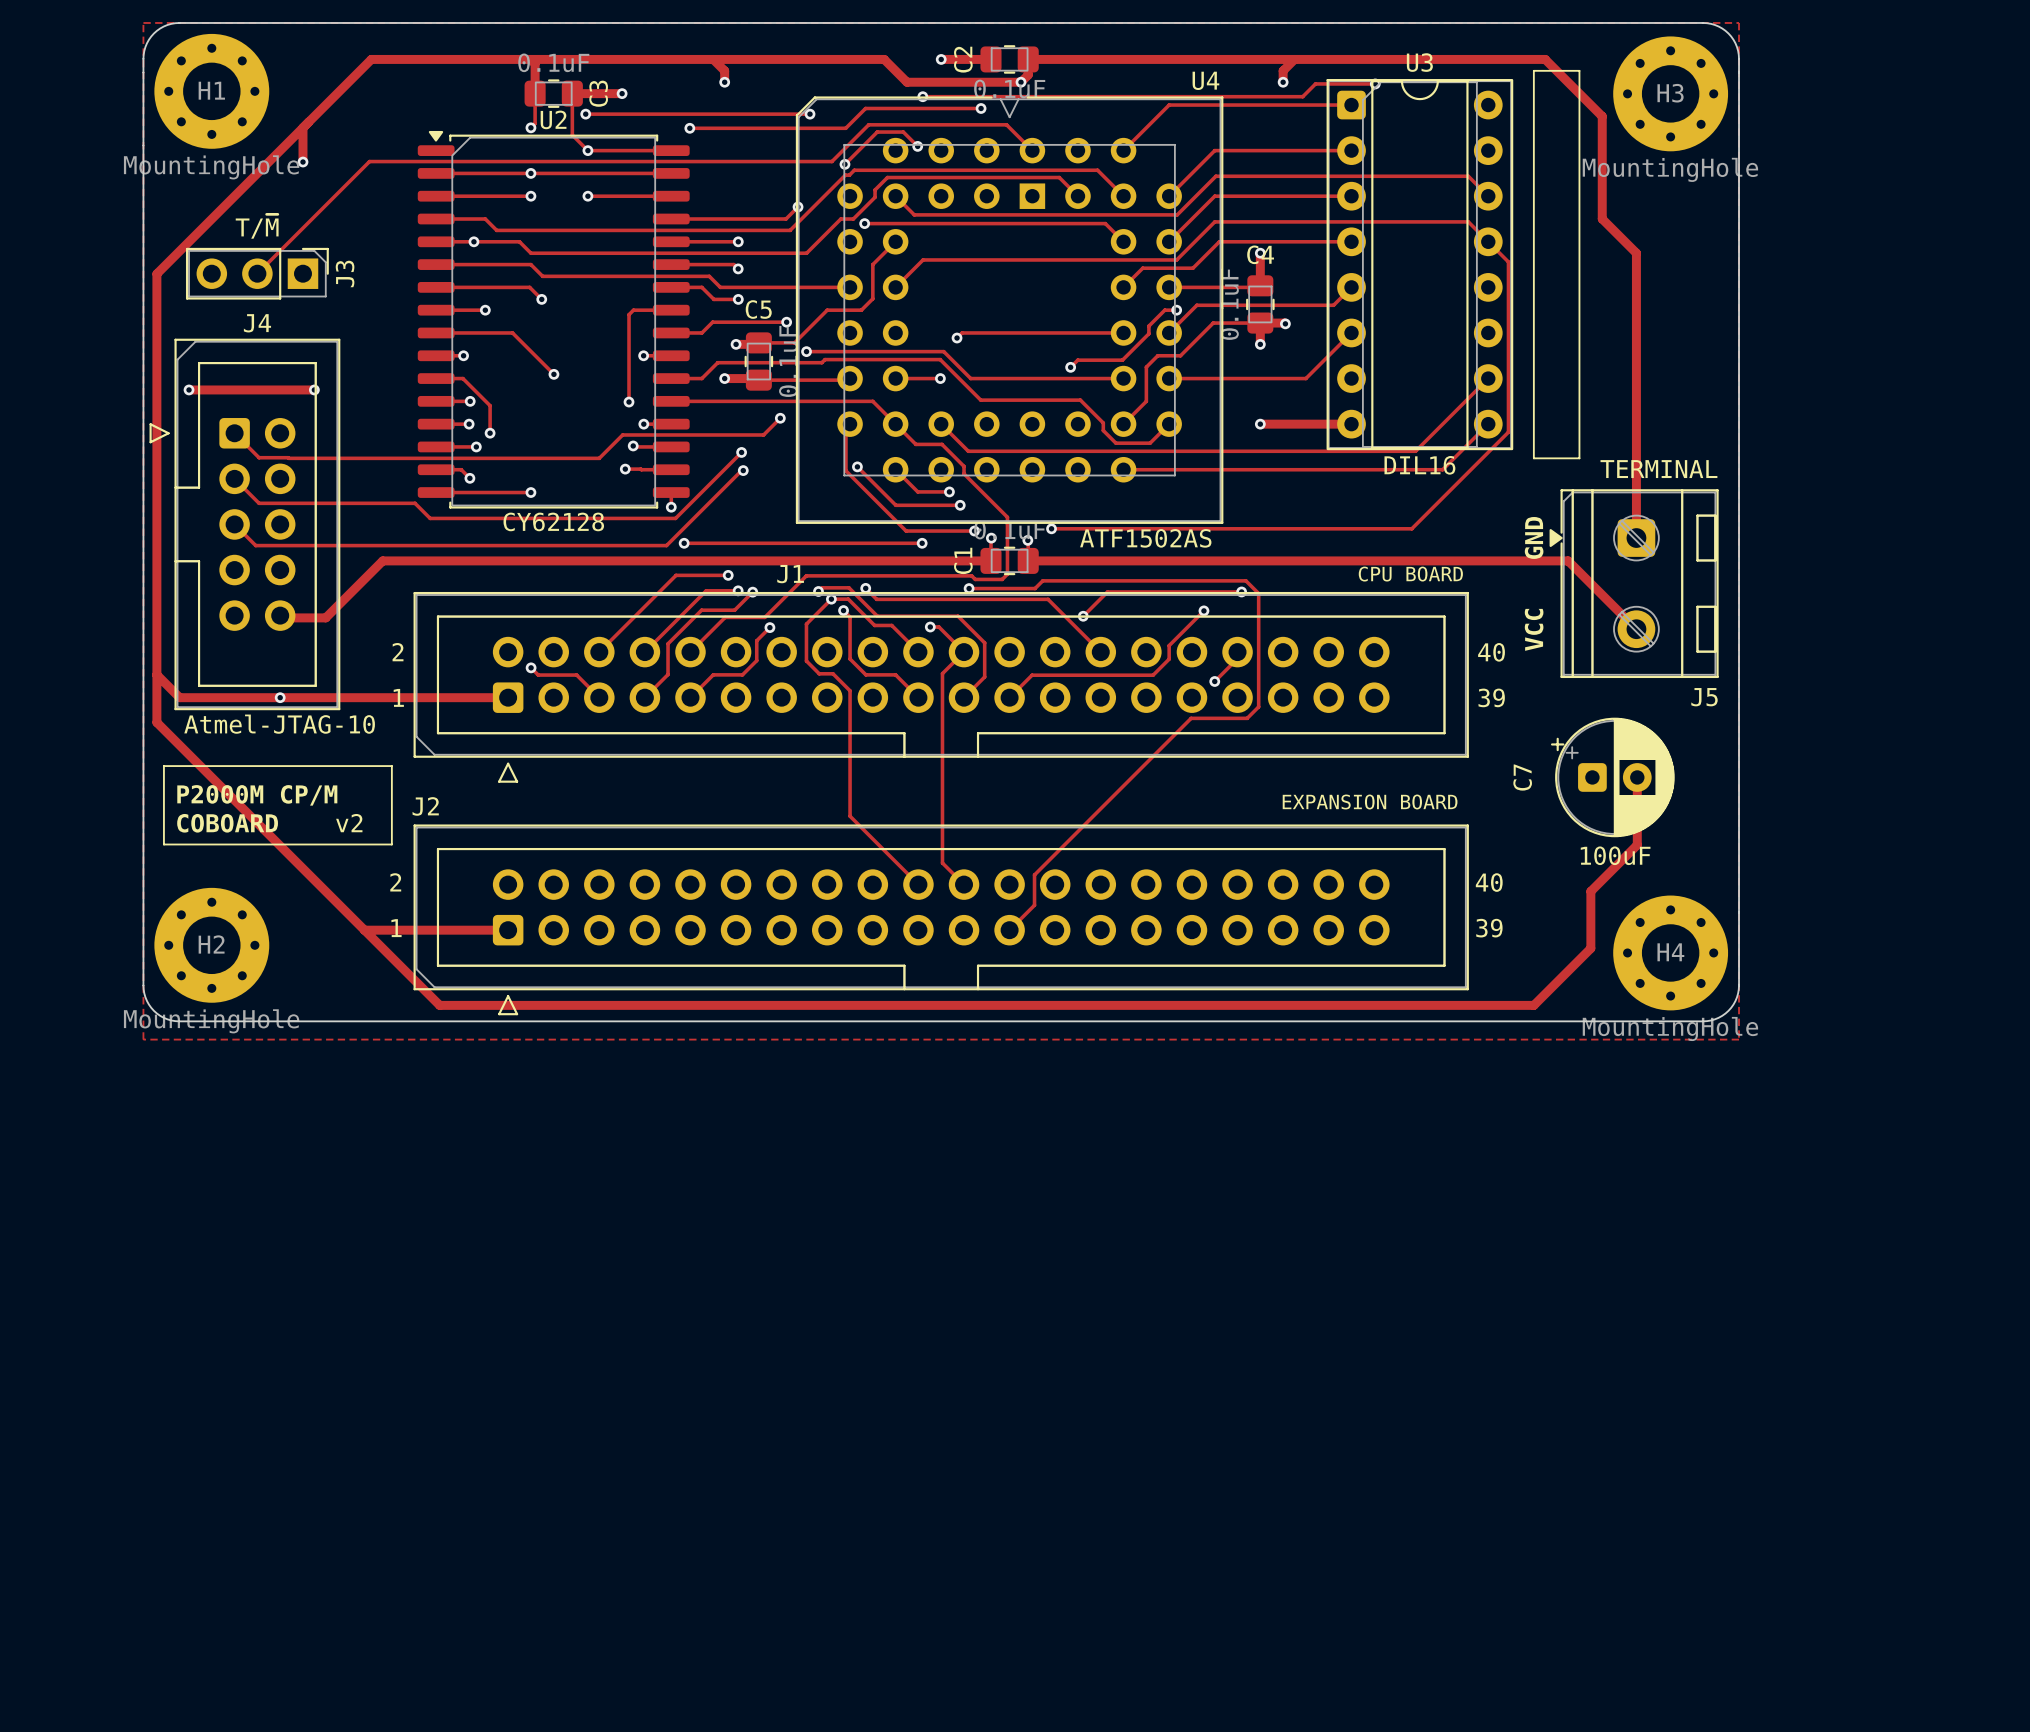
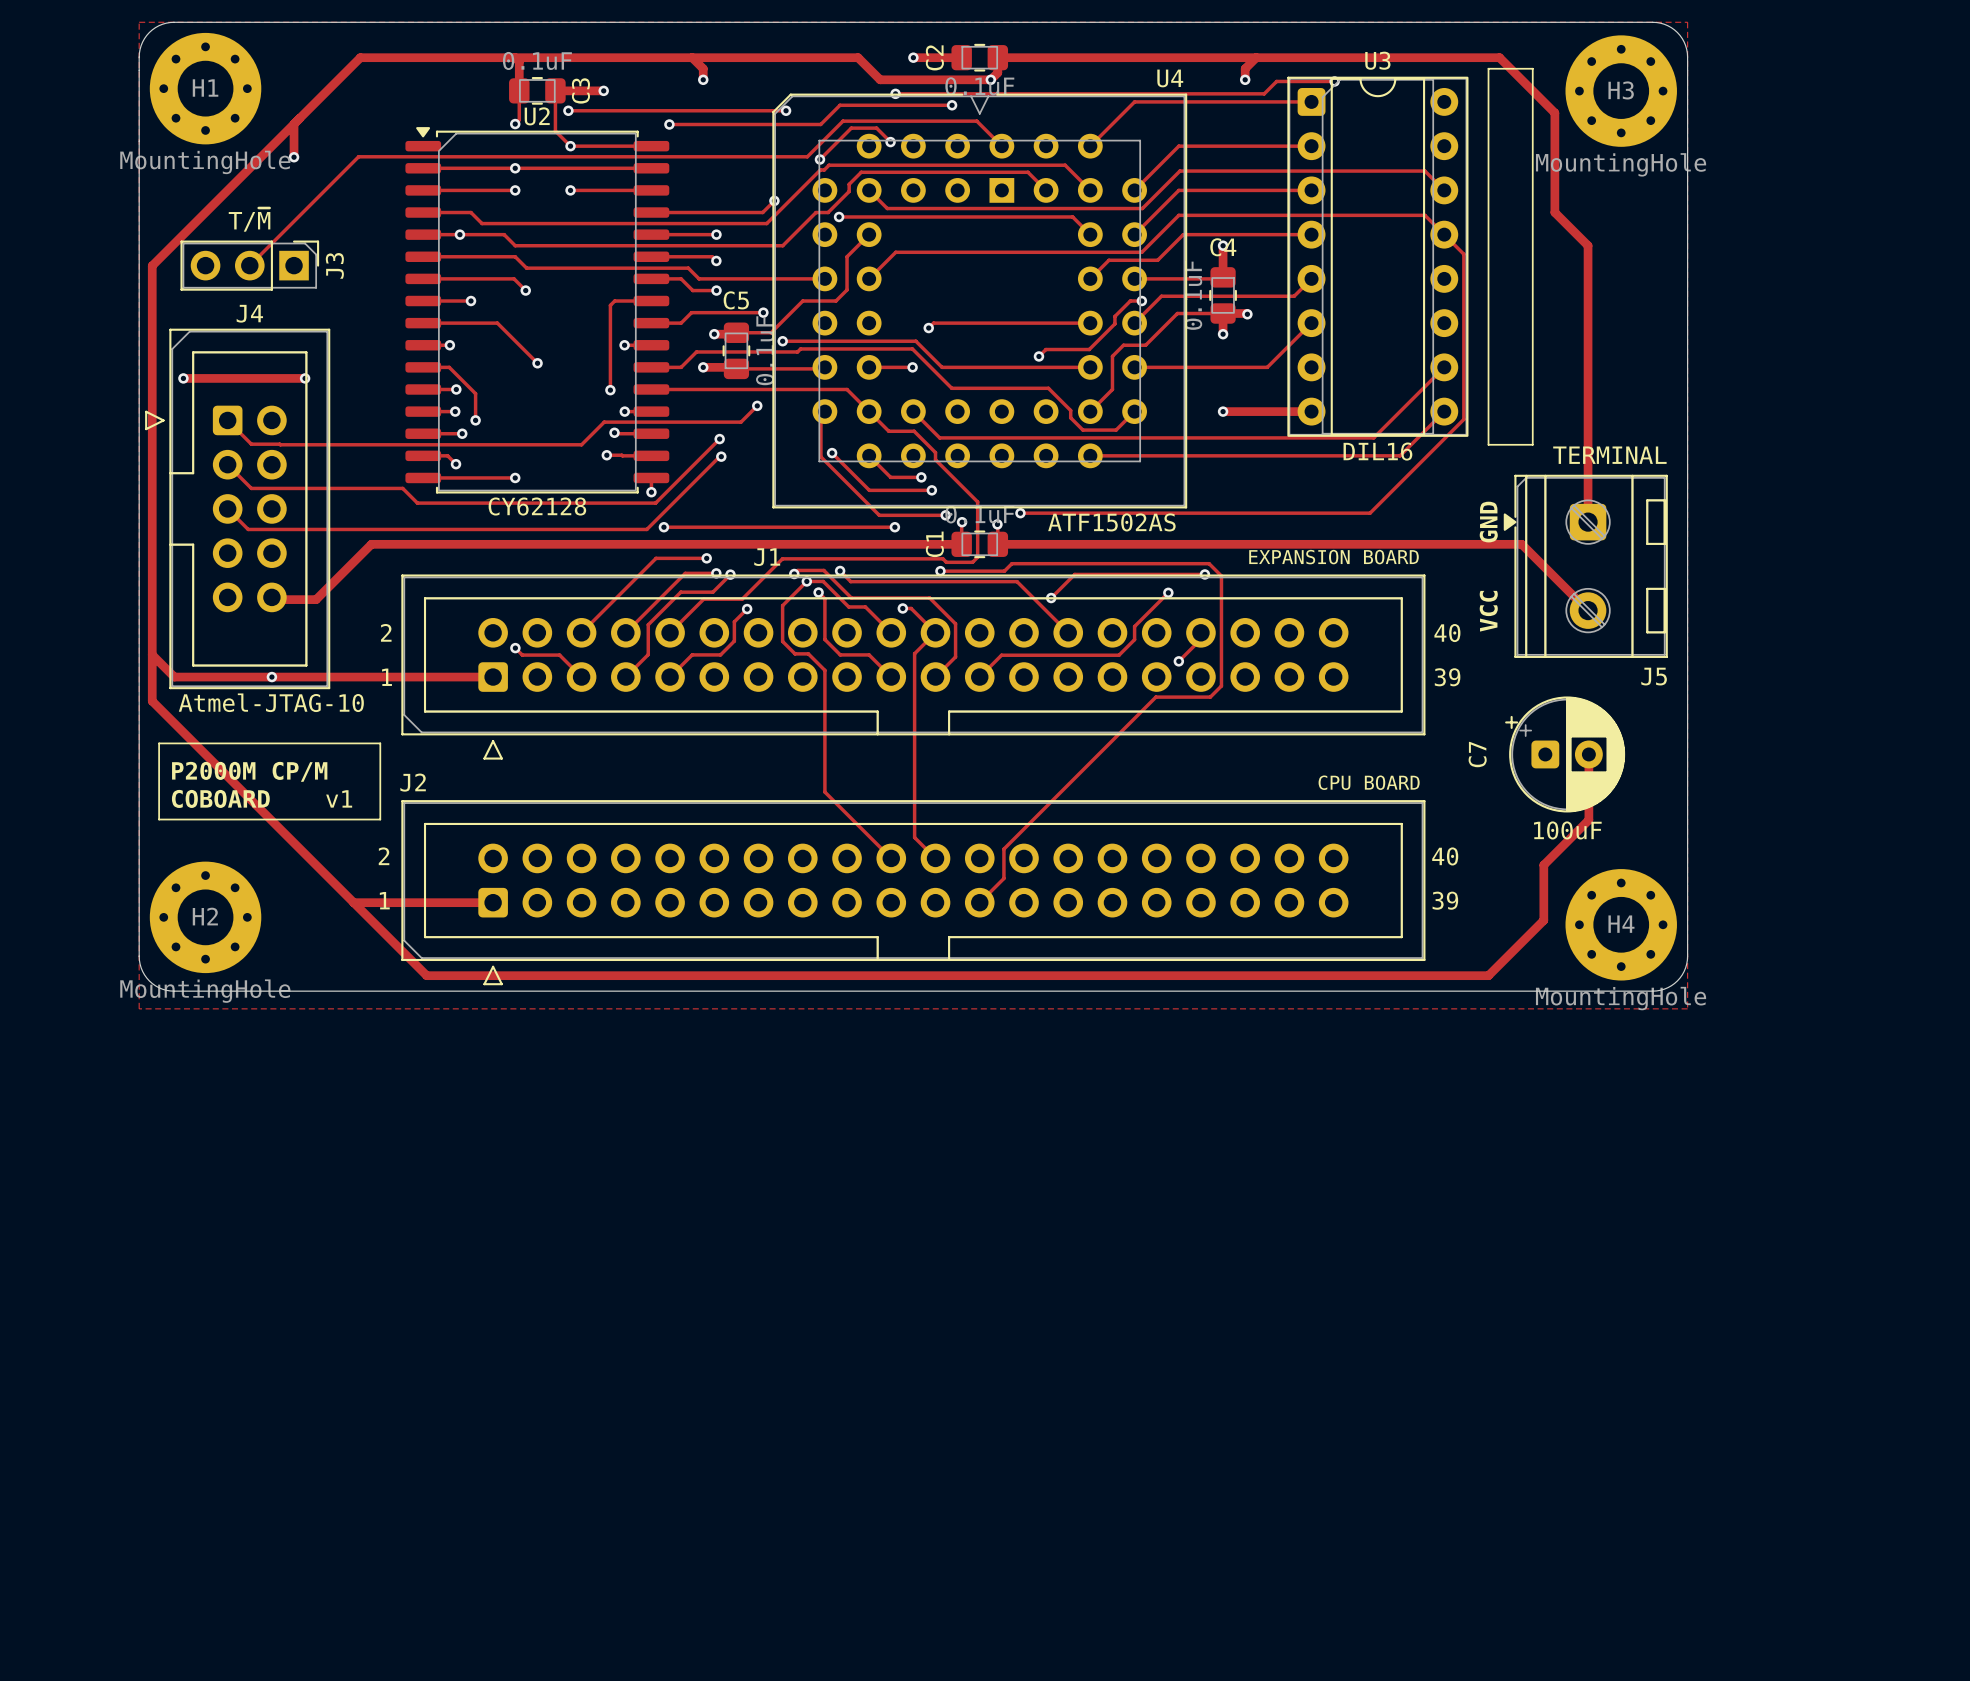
J1 value position: CPU BOARD (1410, 574) -> CPU BOARD (1369, 782)
J2 value position: EXPANSION BOARD (1370, 802) -> EXPANSION BOARD (1334, 557)
text: v2 (349, 823) -> v1 (339, 798)

